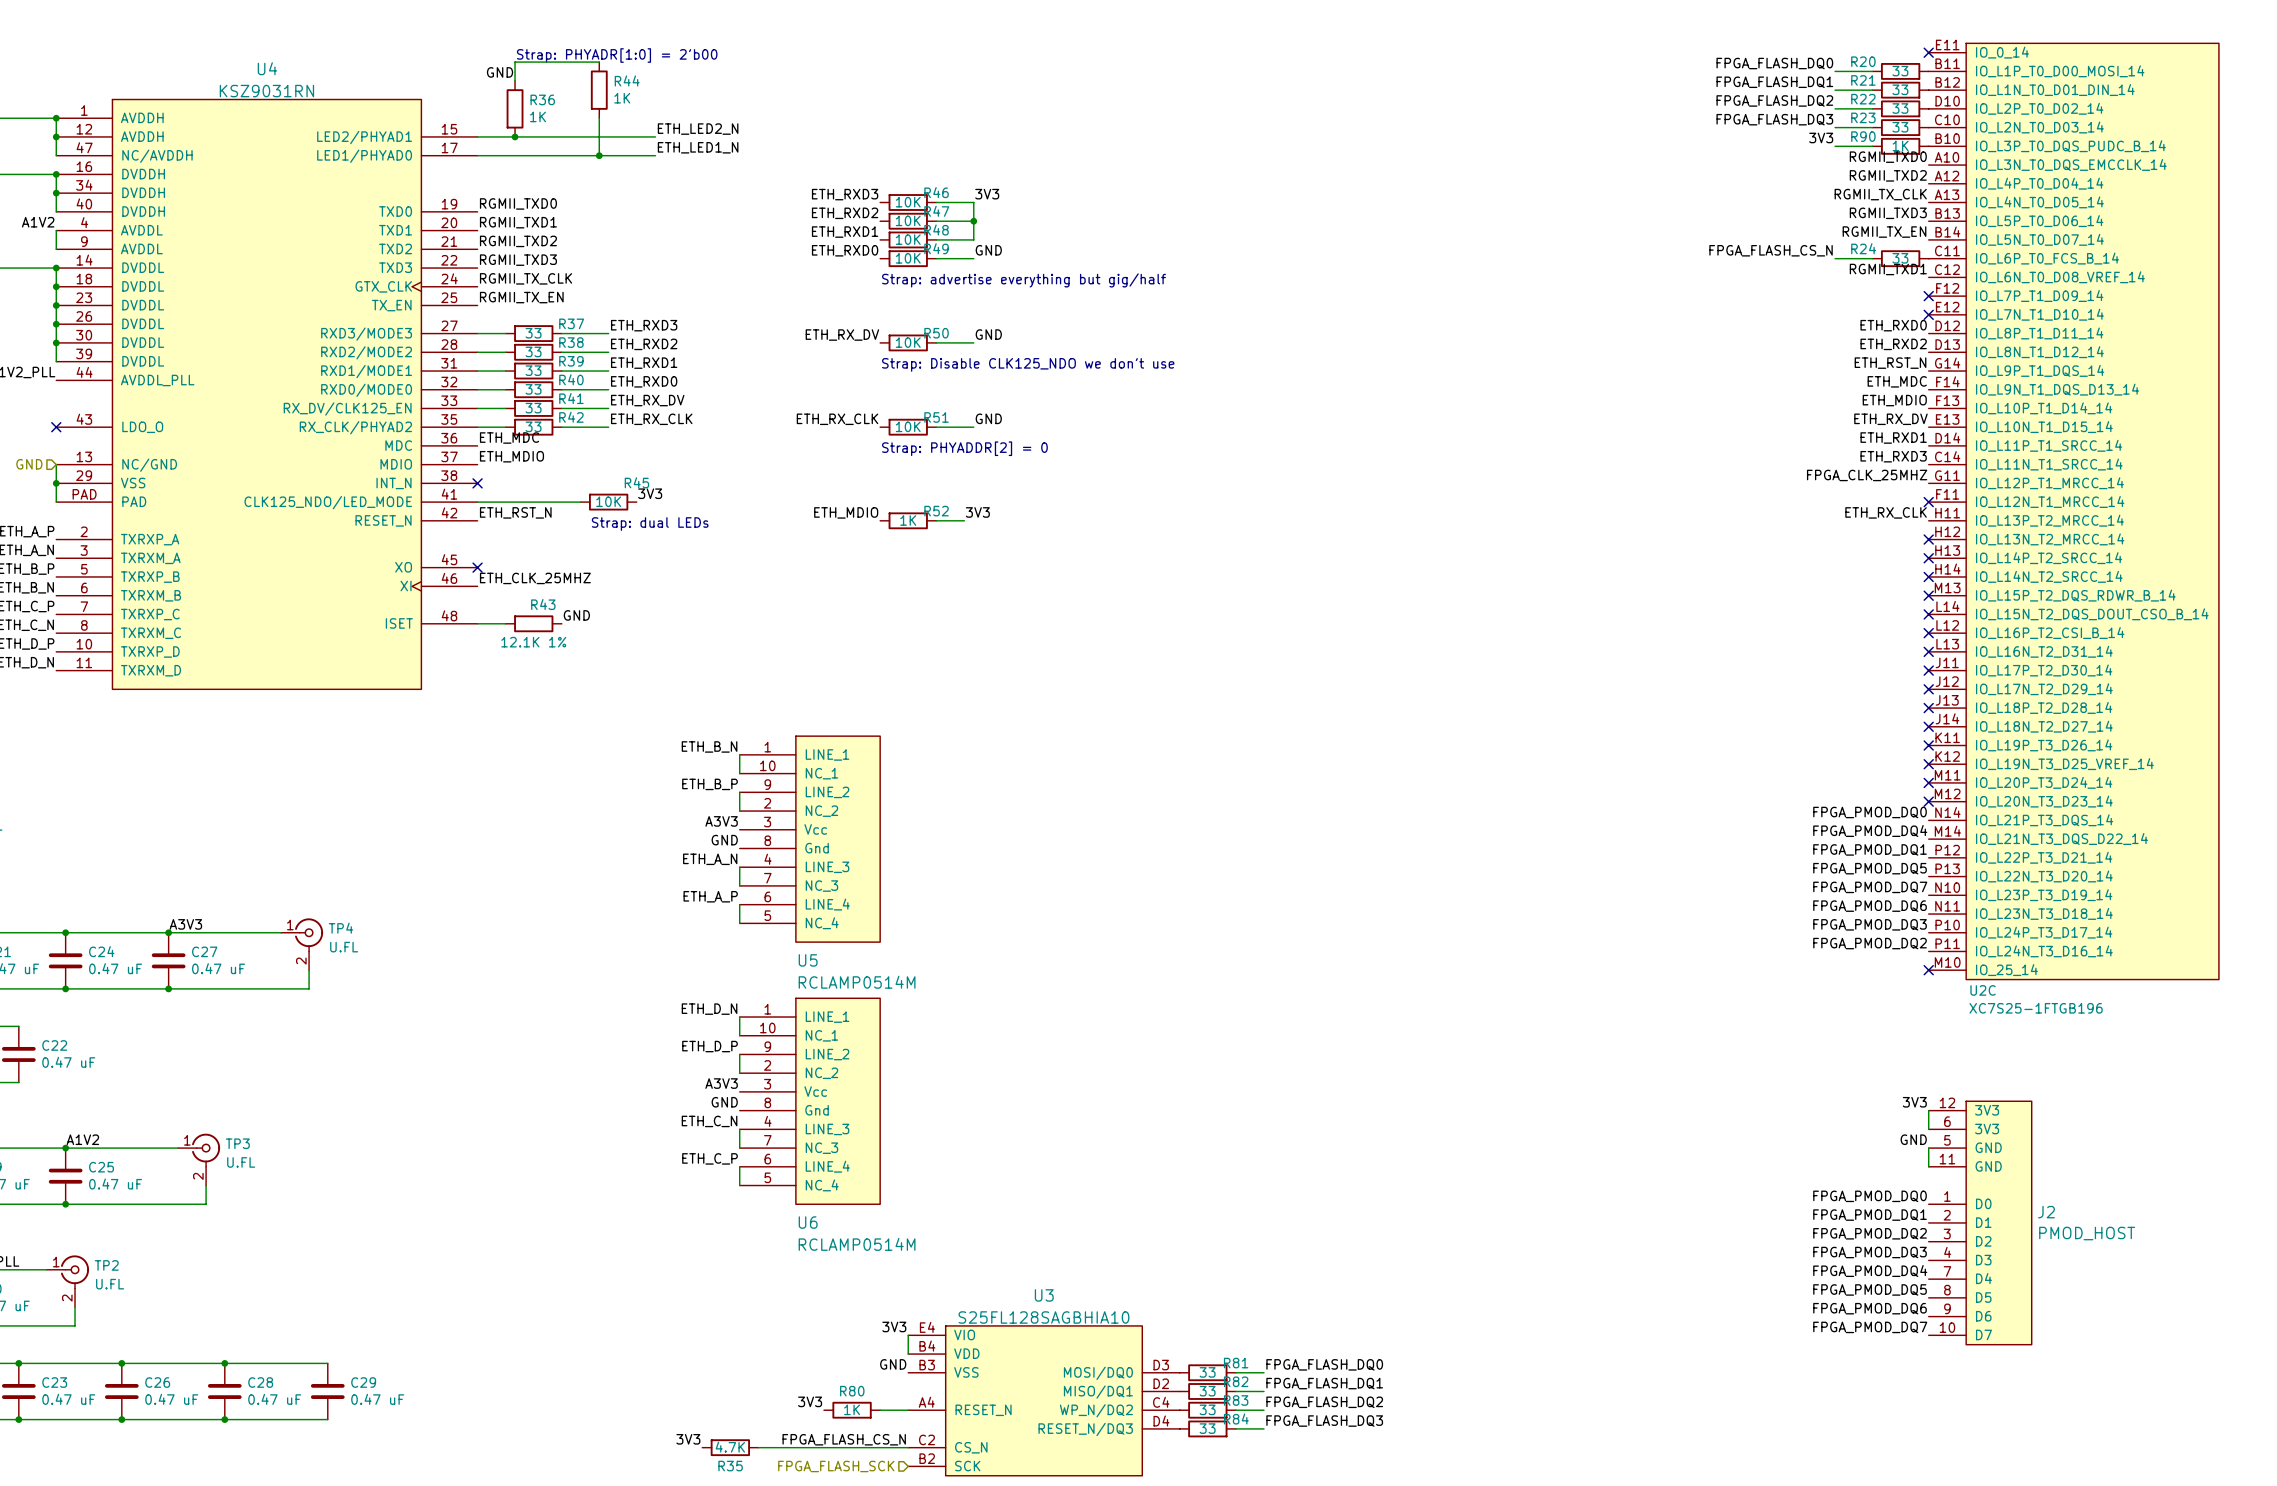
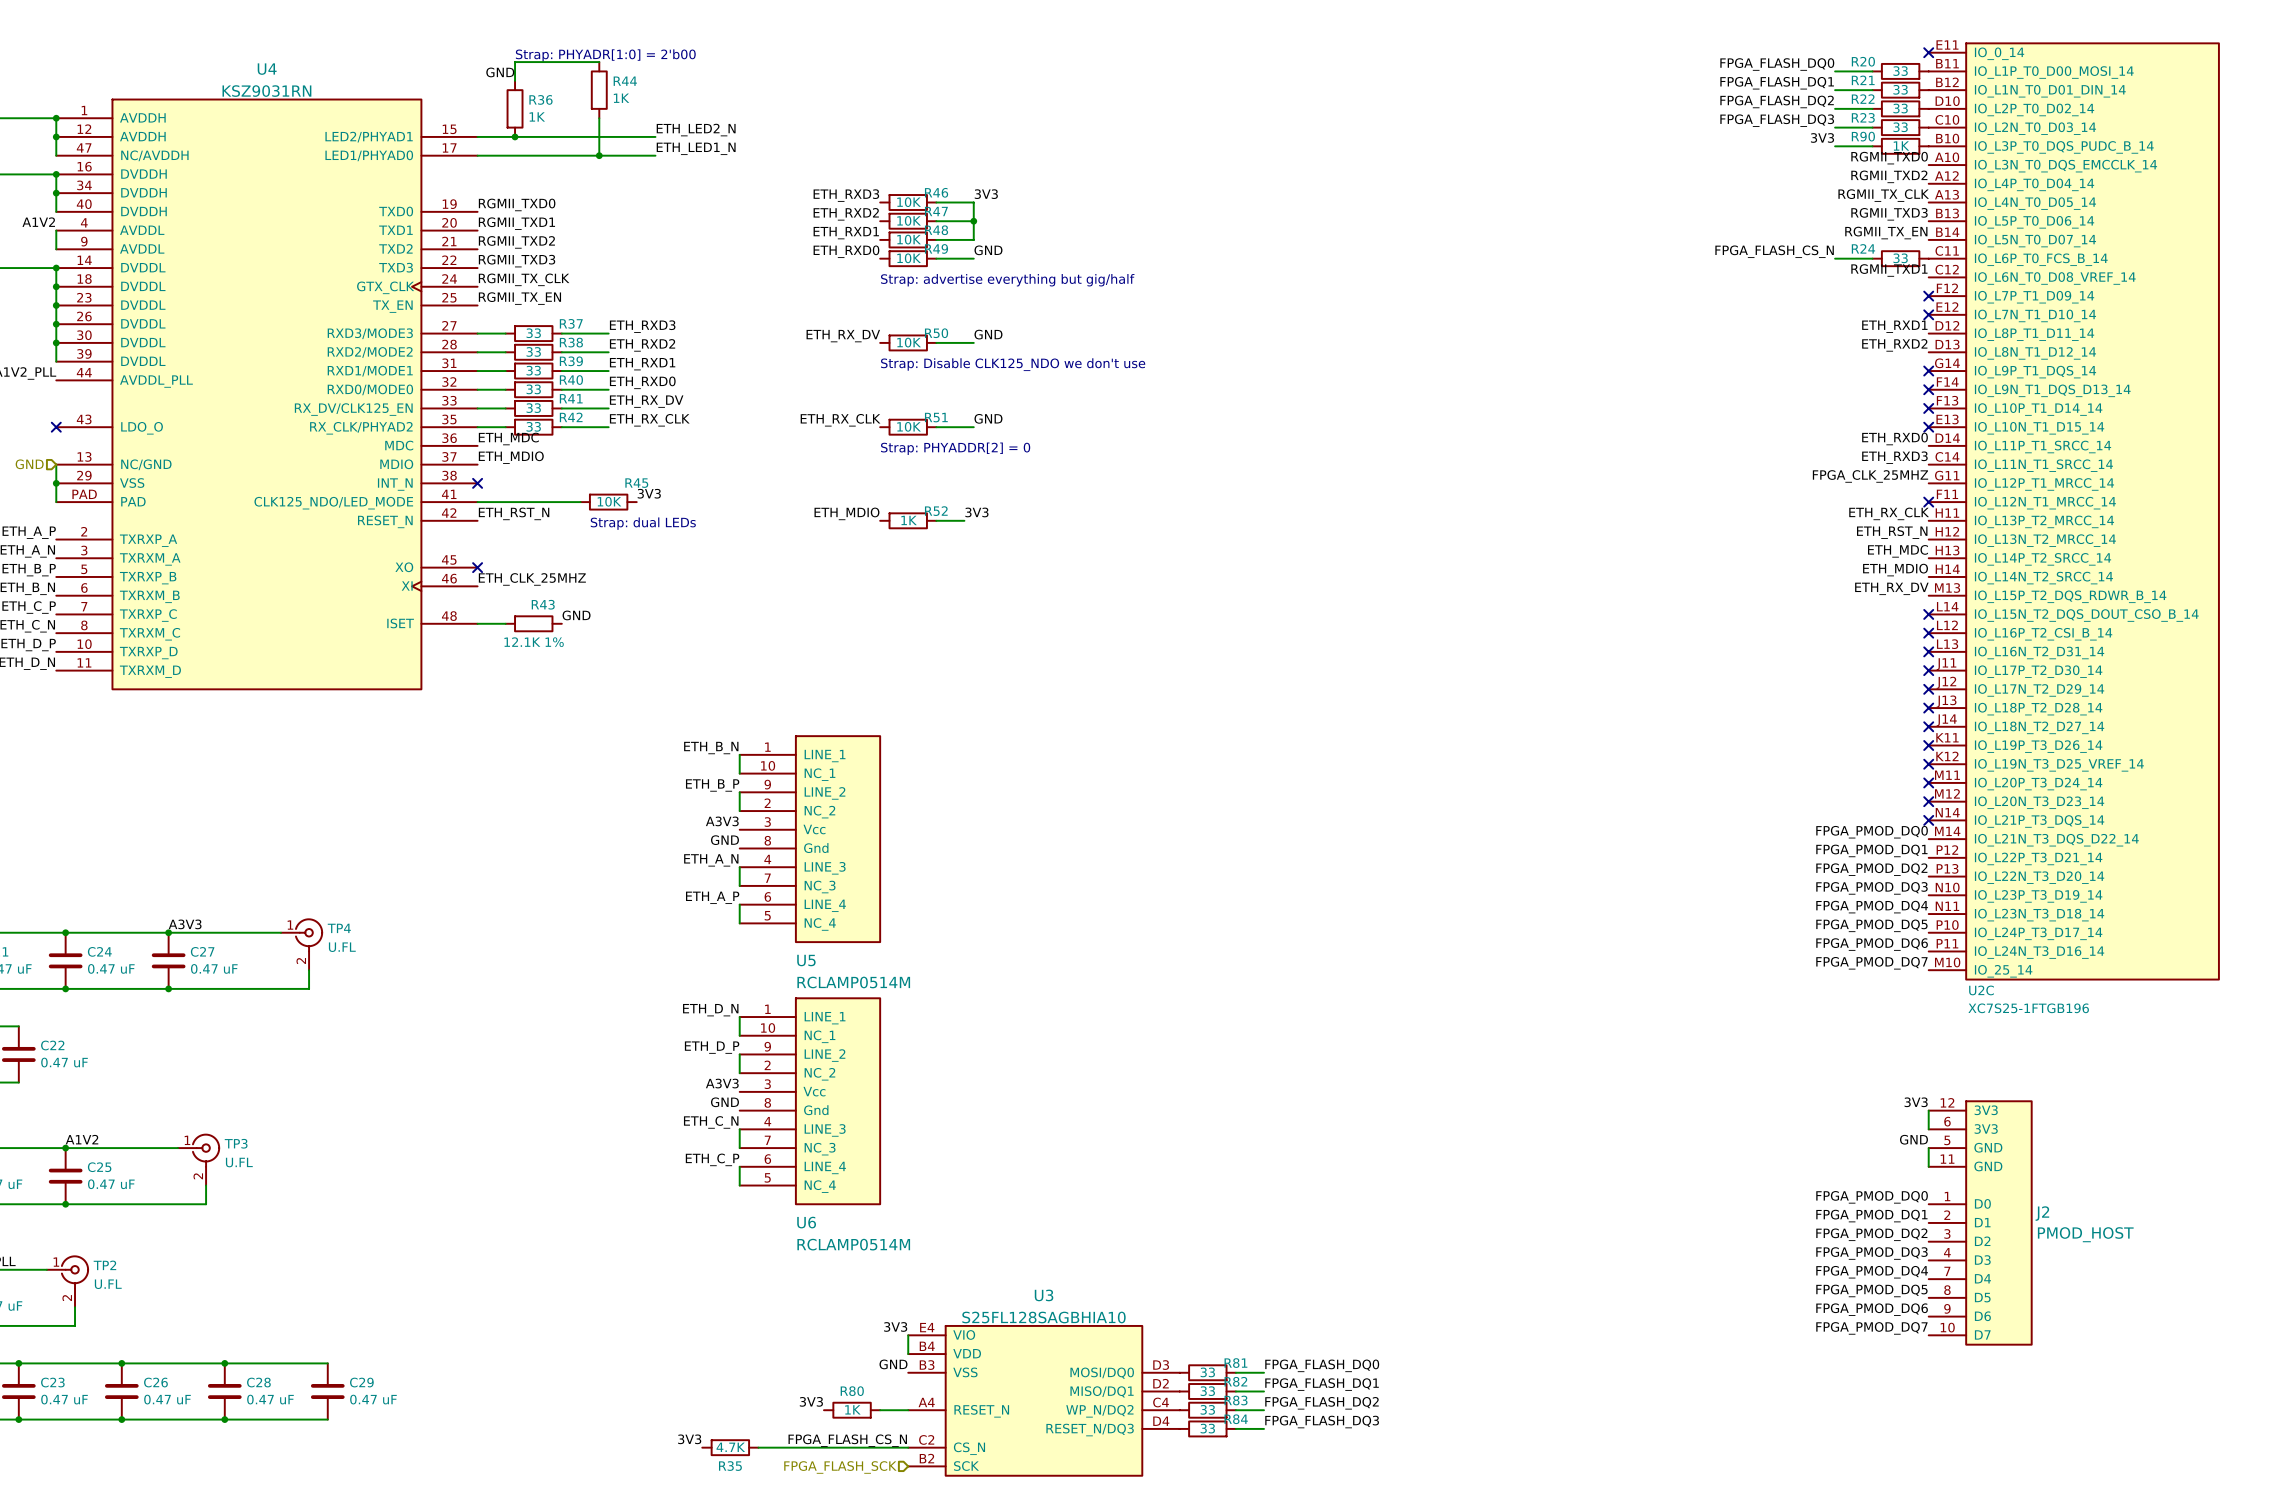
label: ETH_RXD0 (1893, 325) -> ETH_RXD1 (1894, 326)
label position: ETH_RST_N (1890, 363) -> ETH_RST_N (1892, 532)
no-connect mark: none -> (1928, 371)
label position: ETH_MDC (1897, 381) -> ETH_MDC (1898, 551)
no-connect mark: none -> (1928, 389)
label position: ETH_MDIO (1894, 400) -> ETH_MDIO (1895, 570)
no-connect mark: none -> (1928, 408)
label position: ETH_RX_DV (1890, 419) -> ETH_RX_DV (1891, 588)
no-connect mark: none -> (1928, 427)
label: ETH_RXD1 (1893, 438) -> ETH_RXD0 (1895, 438)
no-connect mark: (1928, 539) -> none
no-connect mark: (1928, 558) -> none
no-connect mark: (1928, 576) -> none
no-connect mark: (1928, 595) -> none
label: FPGA_PMOD_DQ0 (1870, 812) -> none
no-connect mark: none -> (1928, 820)
label: FPGA_PMOD_DQ4 (1870, 830) -> FPGA_PMOD_DQ0 (1872, 832)
label: FPGA_PMOD_DQ5 (1870, 868) -> FPGA_PMOD_DQ2 (1871, 869)
label: FPGA_PMOD_DQ7 (1870, 887) -> FPGA_PMOD_DQ3 (1871, 888)
label: FPGA_PMOD_DQ6 (1870, 906) -> FPGA_PMOD_DQ4 (1872, 907)
label: FPGA_PMOD_DQ3 (1870, 924) -> FPGA_PMOD_DQ5 (1871, 925)
label: FPGA_PMOD_DQ2 (1870, 943) -> FPGA_PMOD_DQ6 (1872, 944)
label: none -> FPGA_PMOD_DQ7 (1871, 963)
no-connect mark: (1928, 970) -> none

